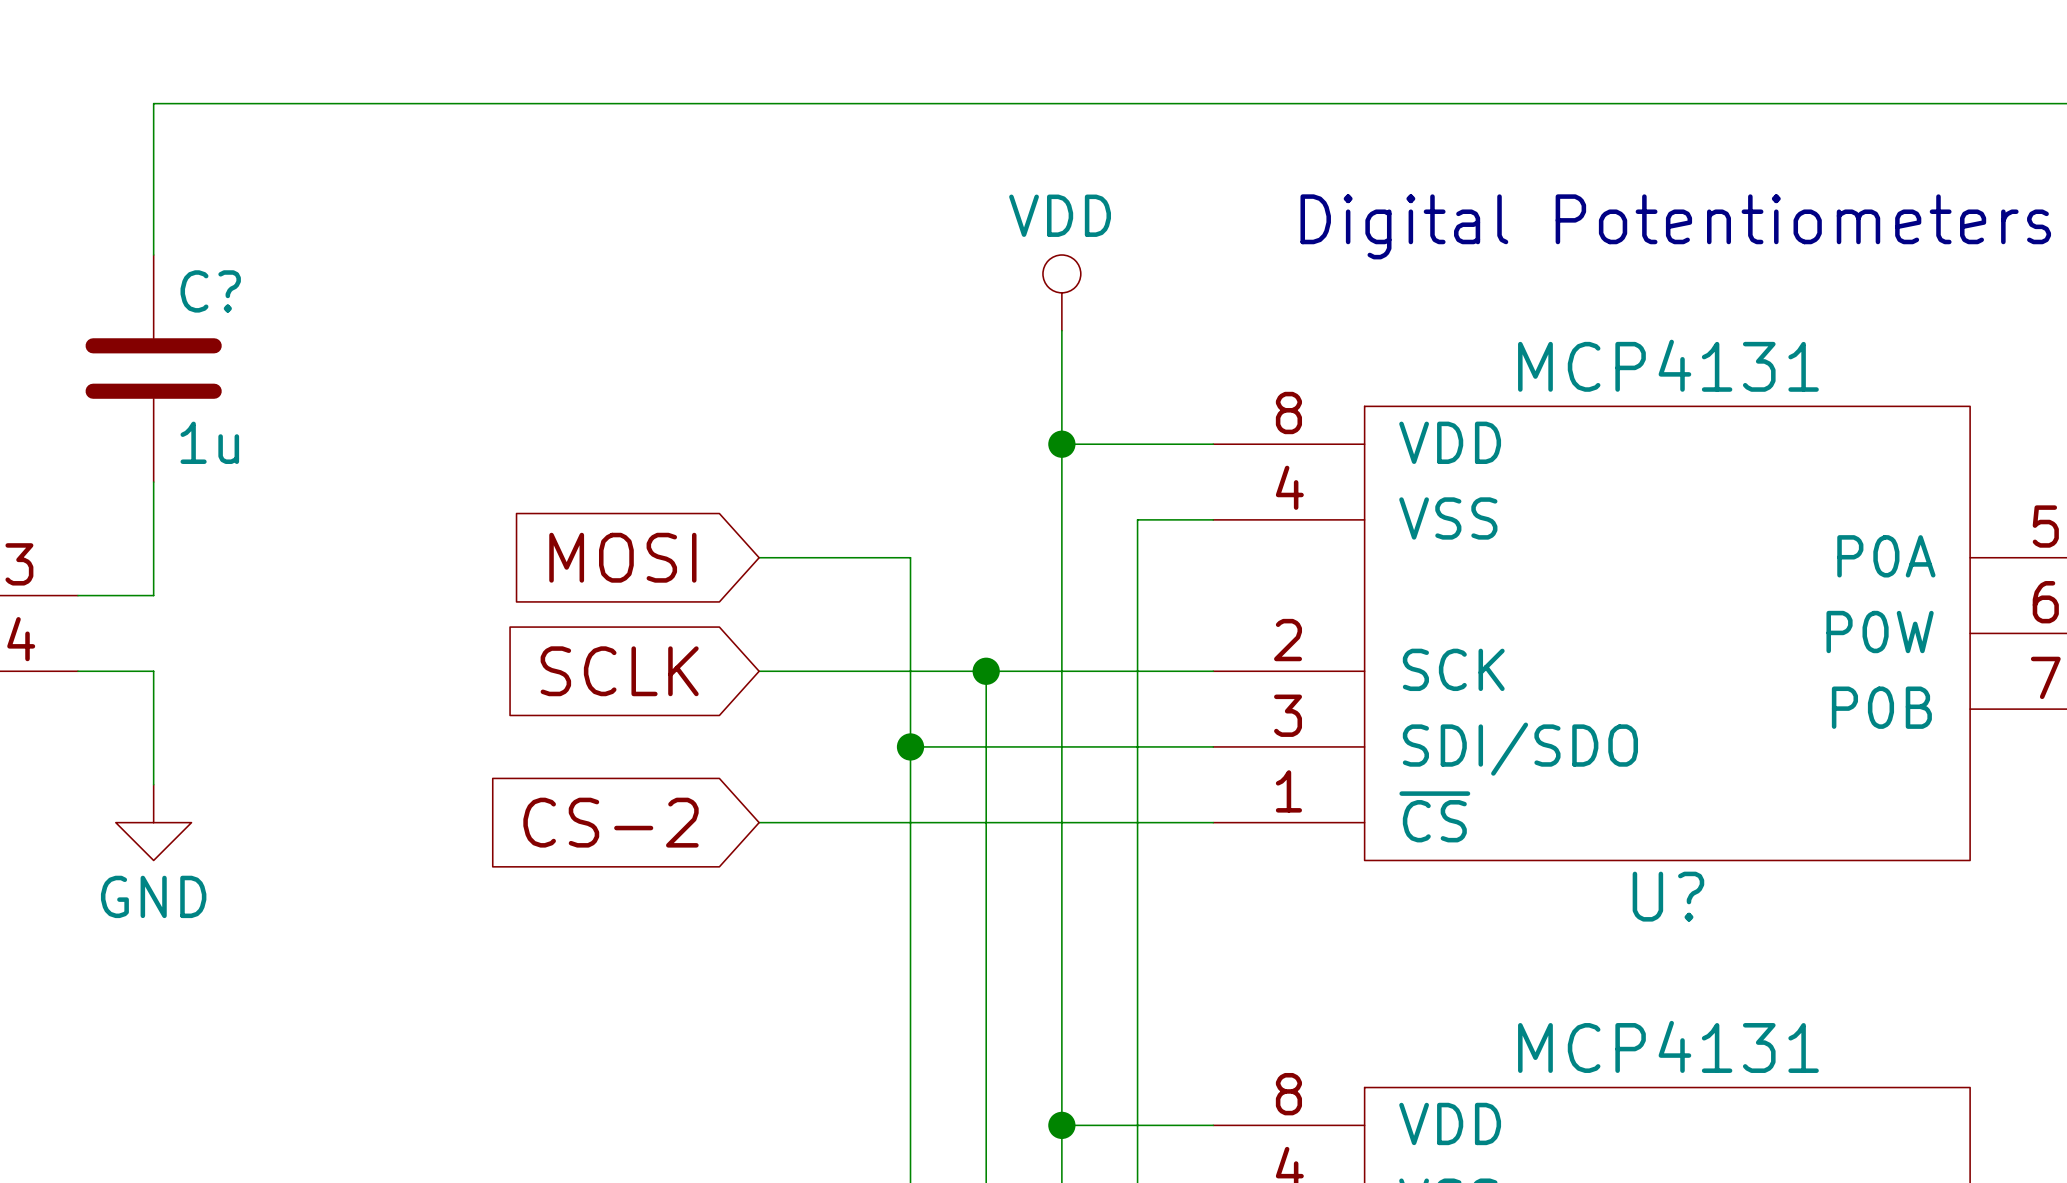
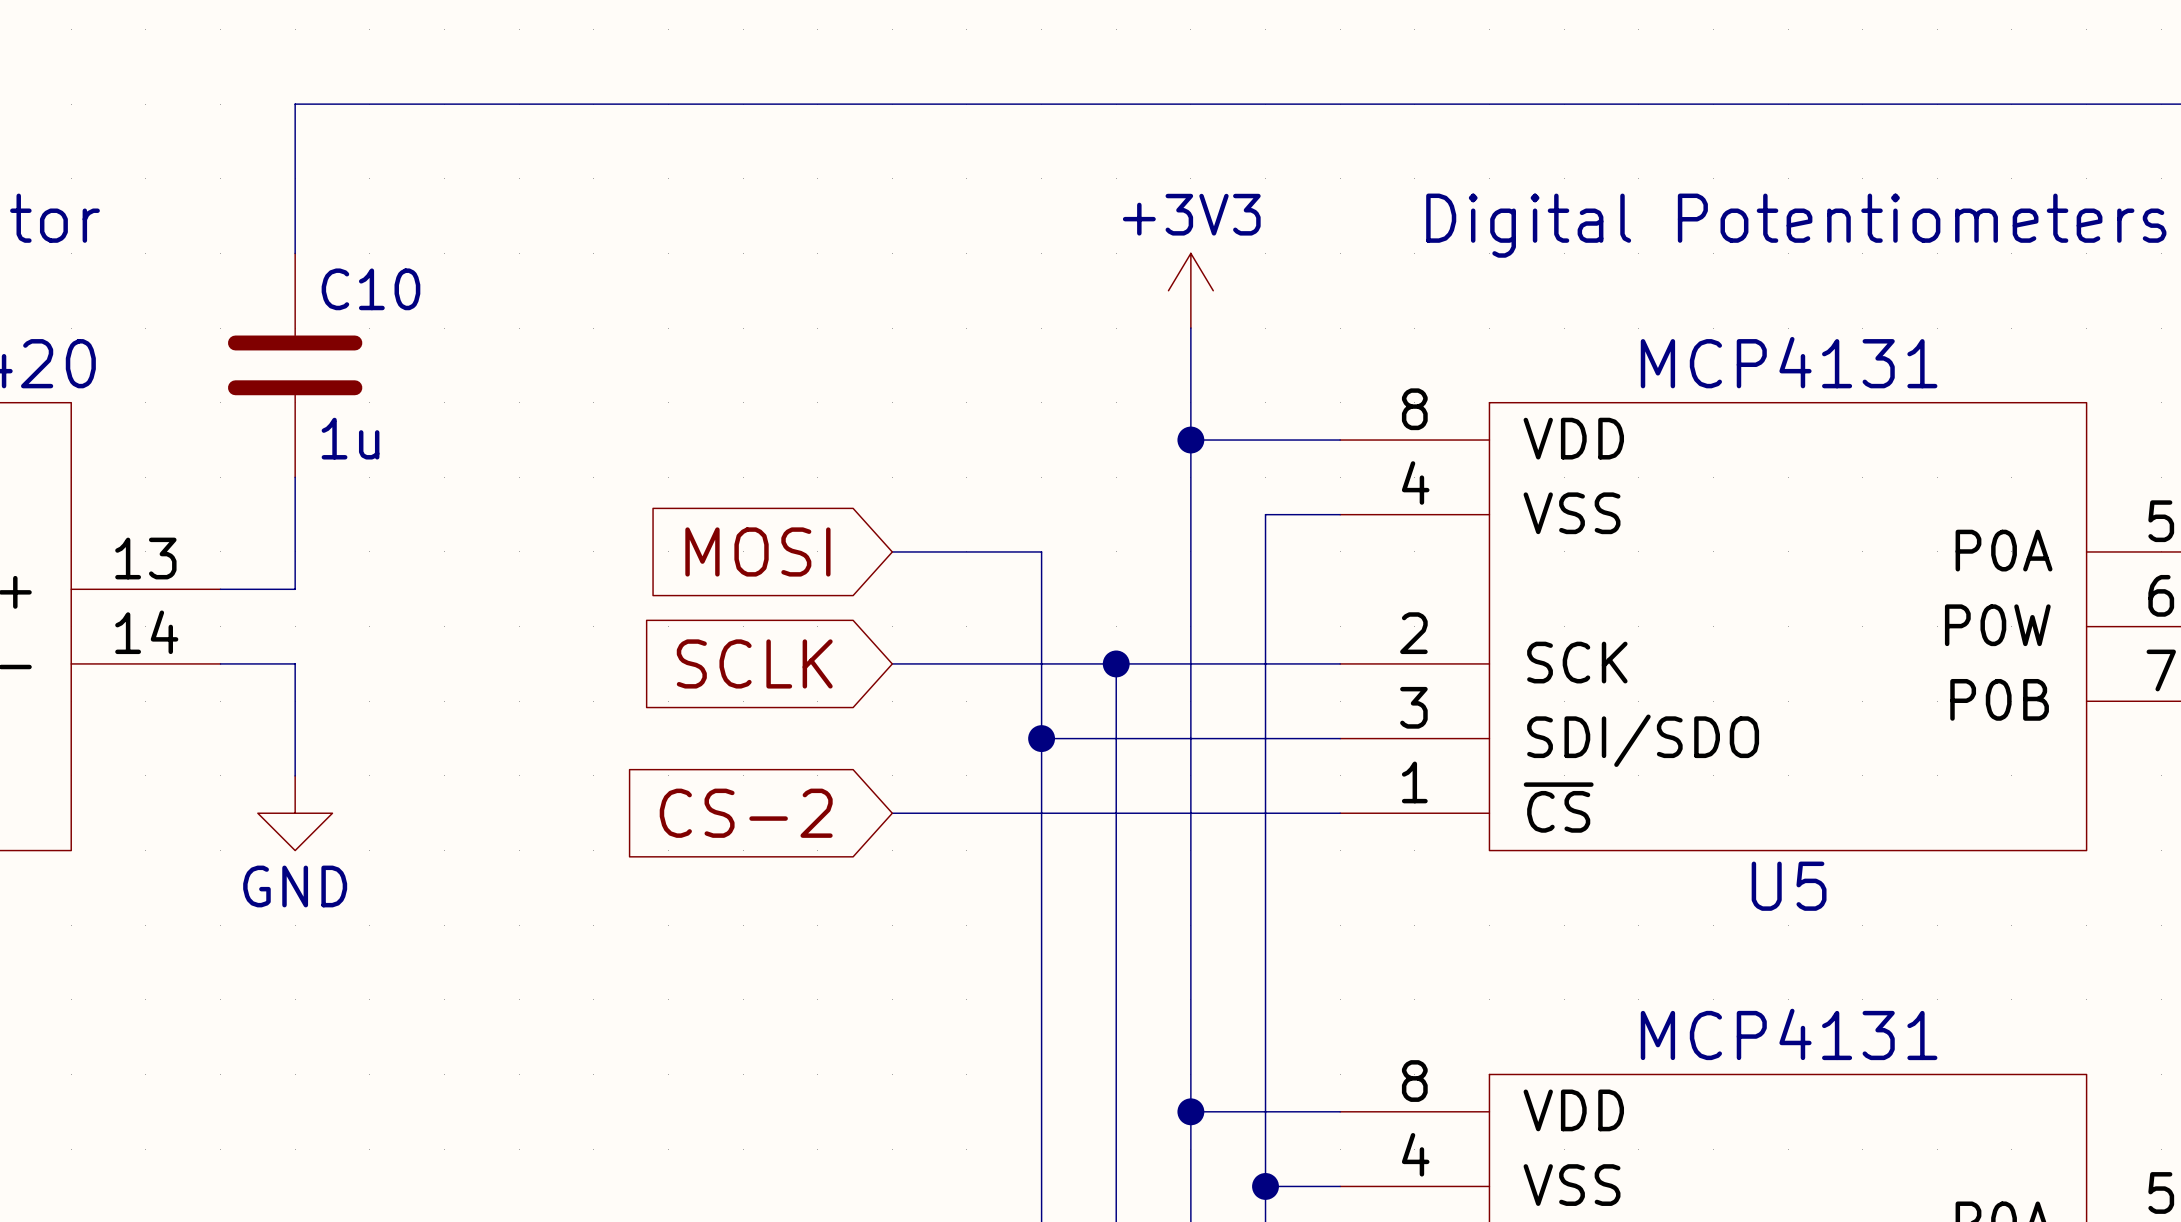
C? name: C? (210, 291) -> C10 (370, 289)
power symbol: VDD (1061, 292) -> +3V3 (1190, 290)
U? name: U? (1668, 896) -> U5 (1789, 886)

